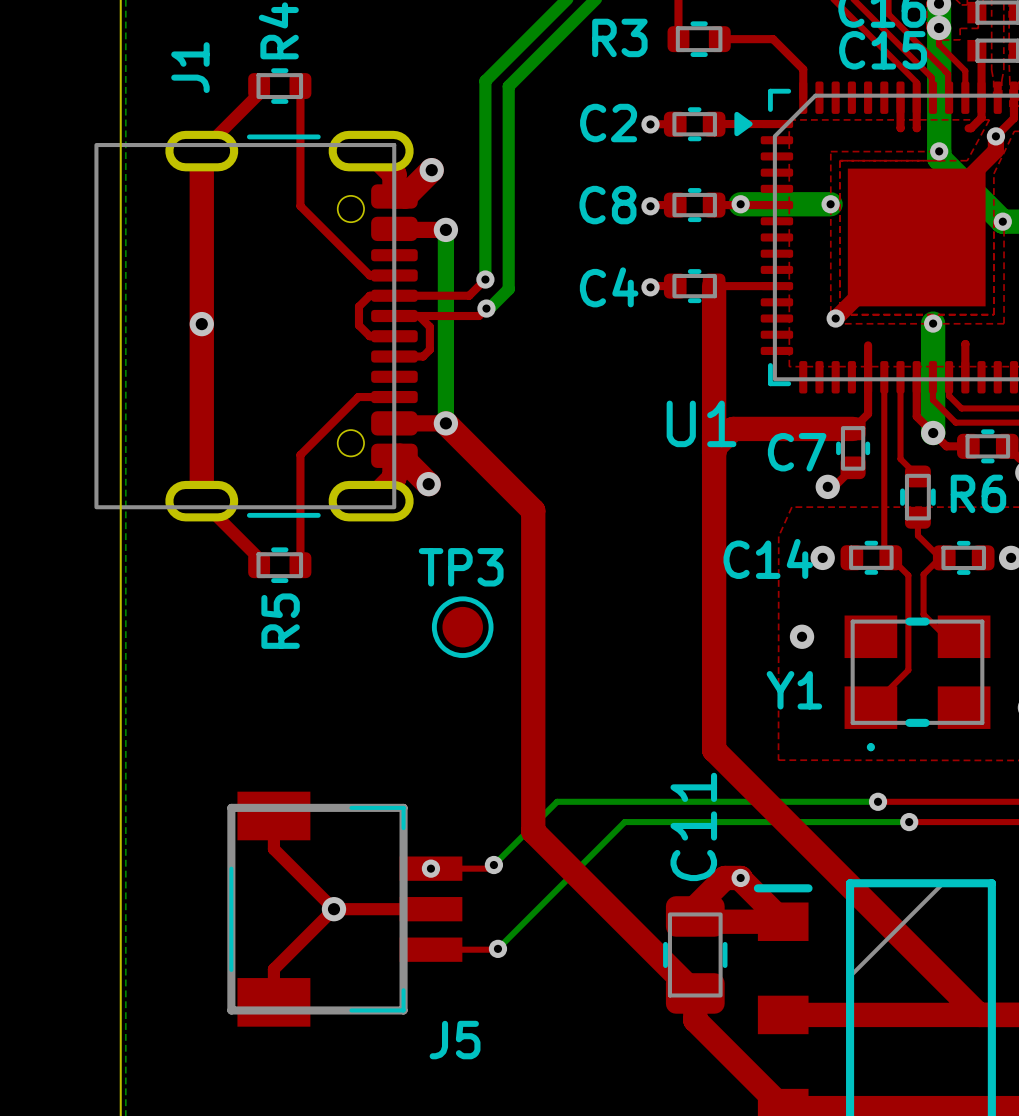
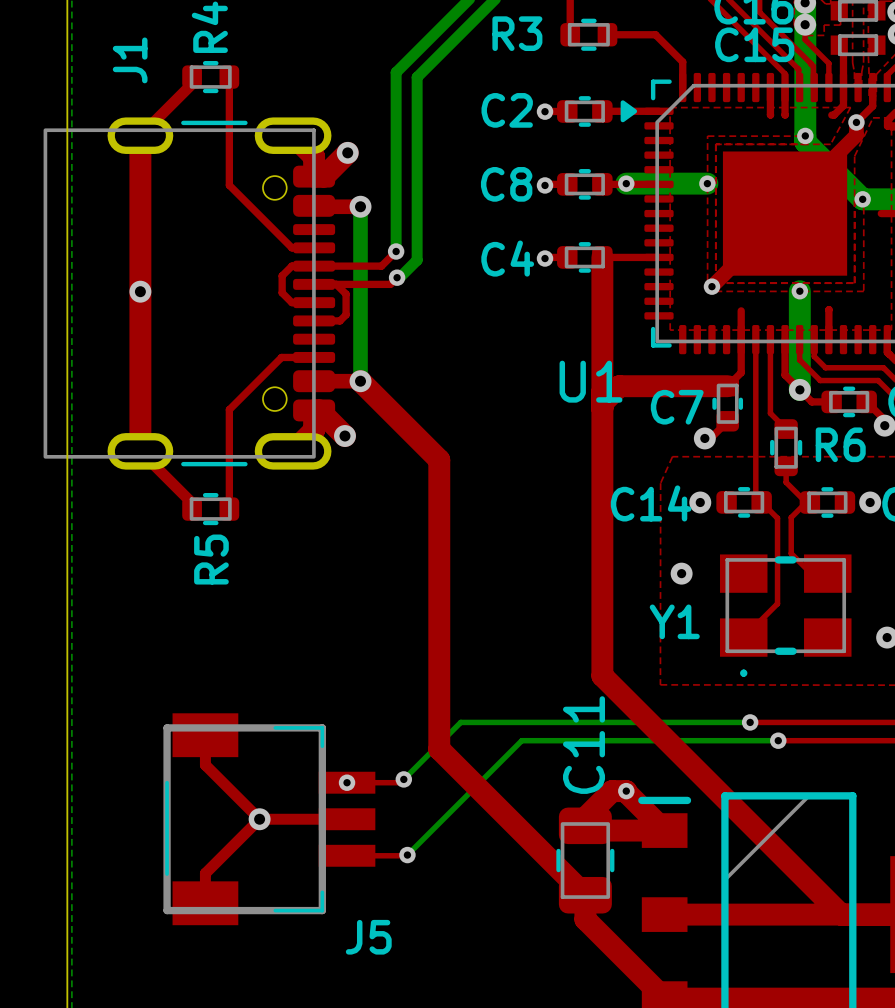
TP3: (462, 627) -> none

